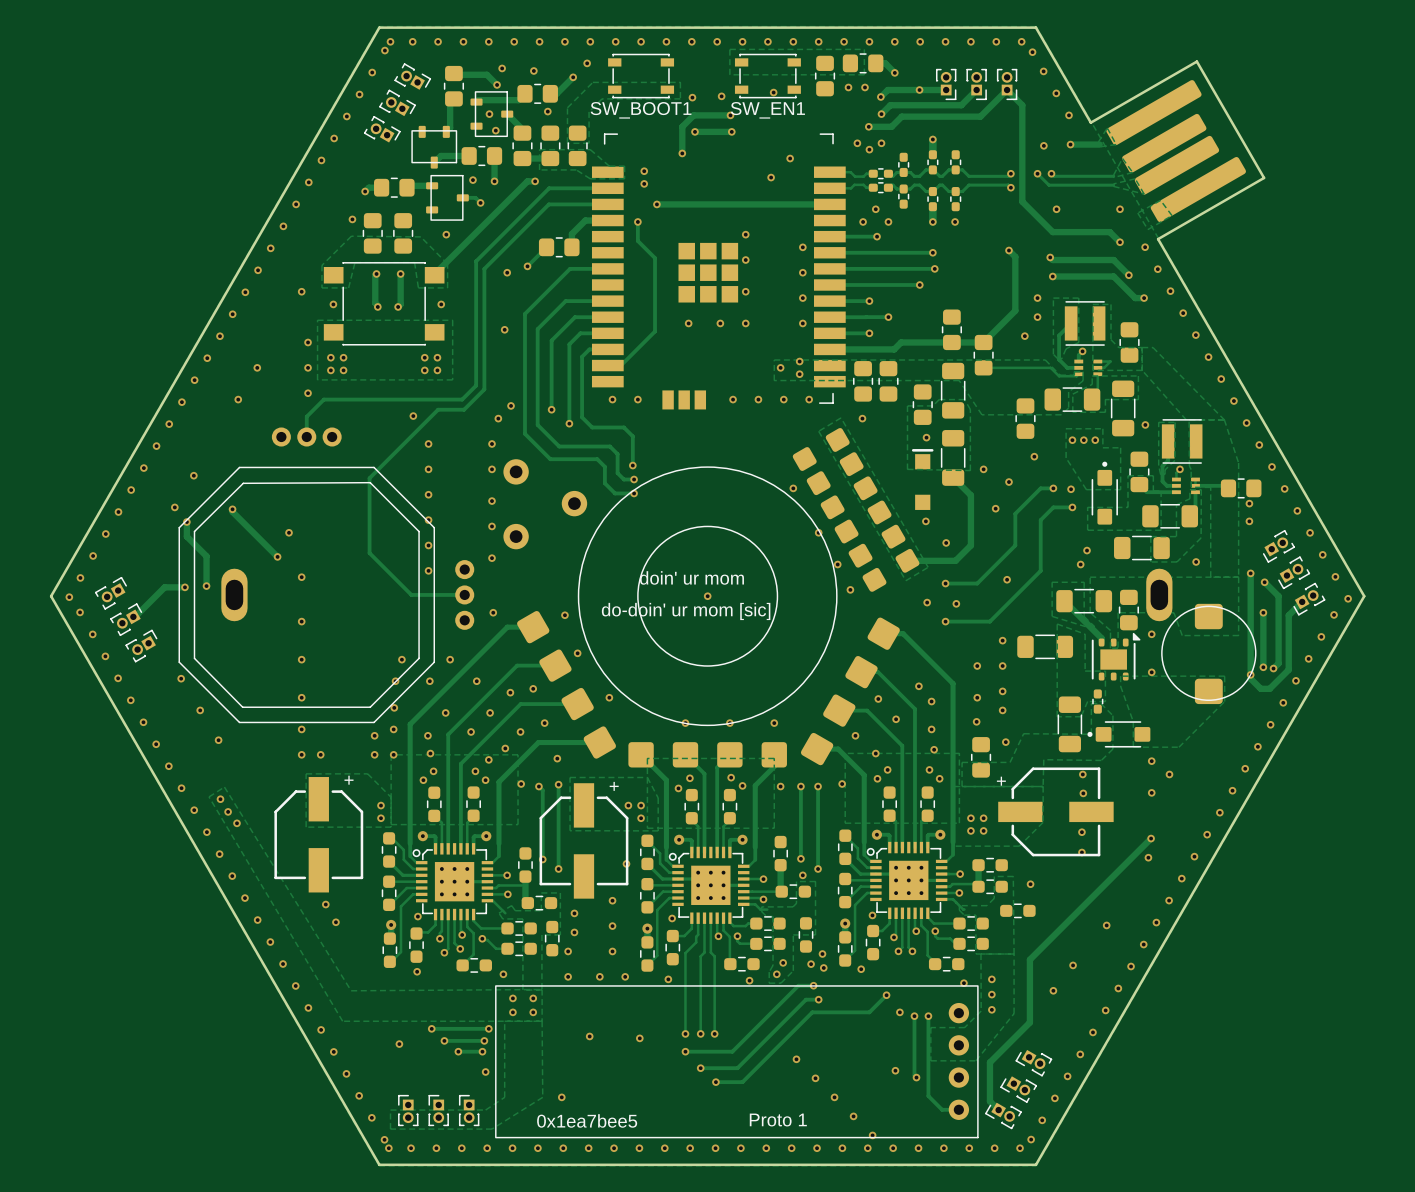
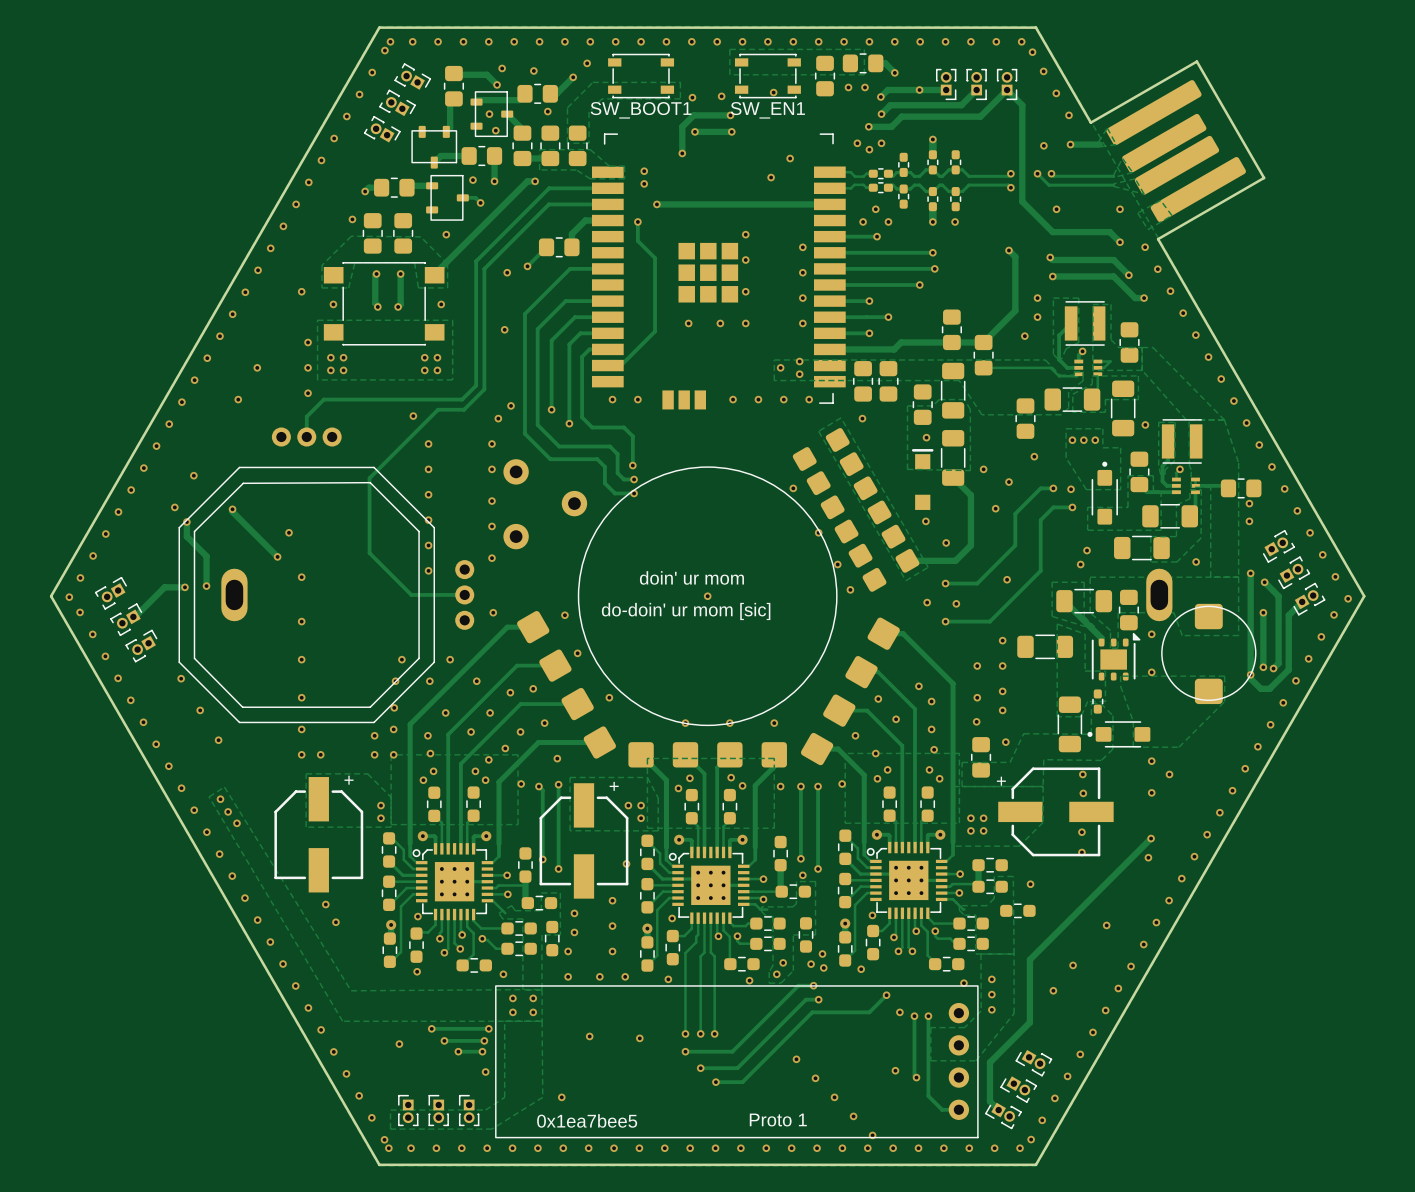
drawing: [637, 525, 779, 667] -> none

